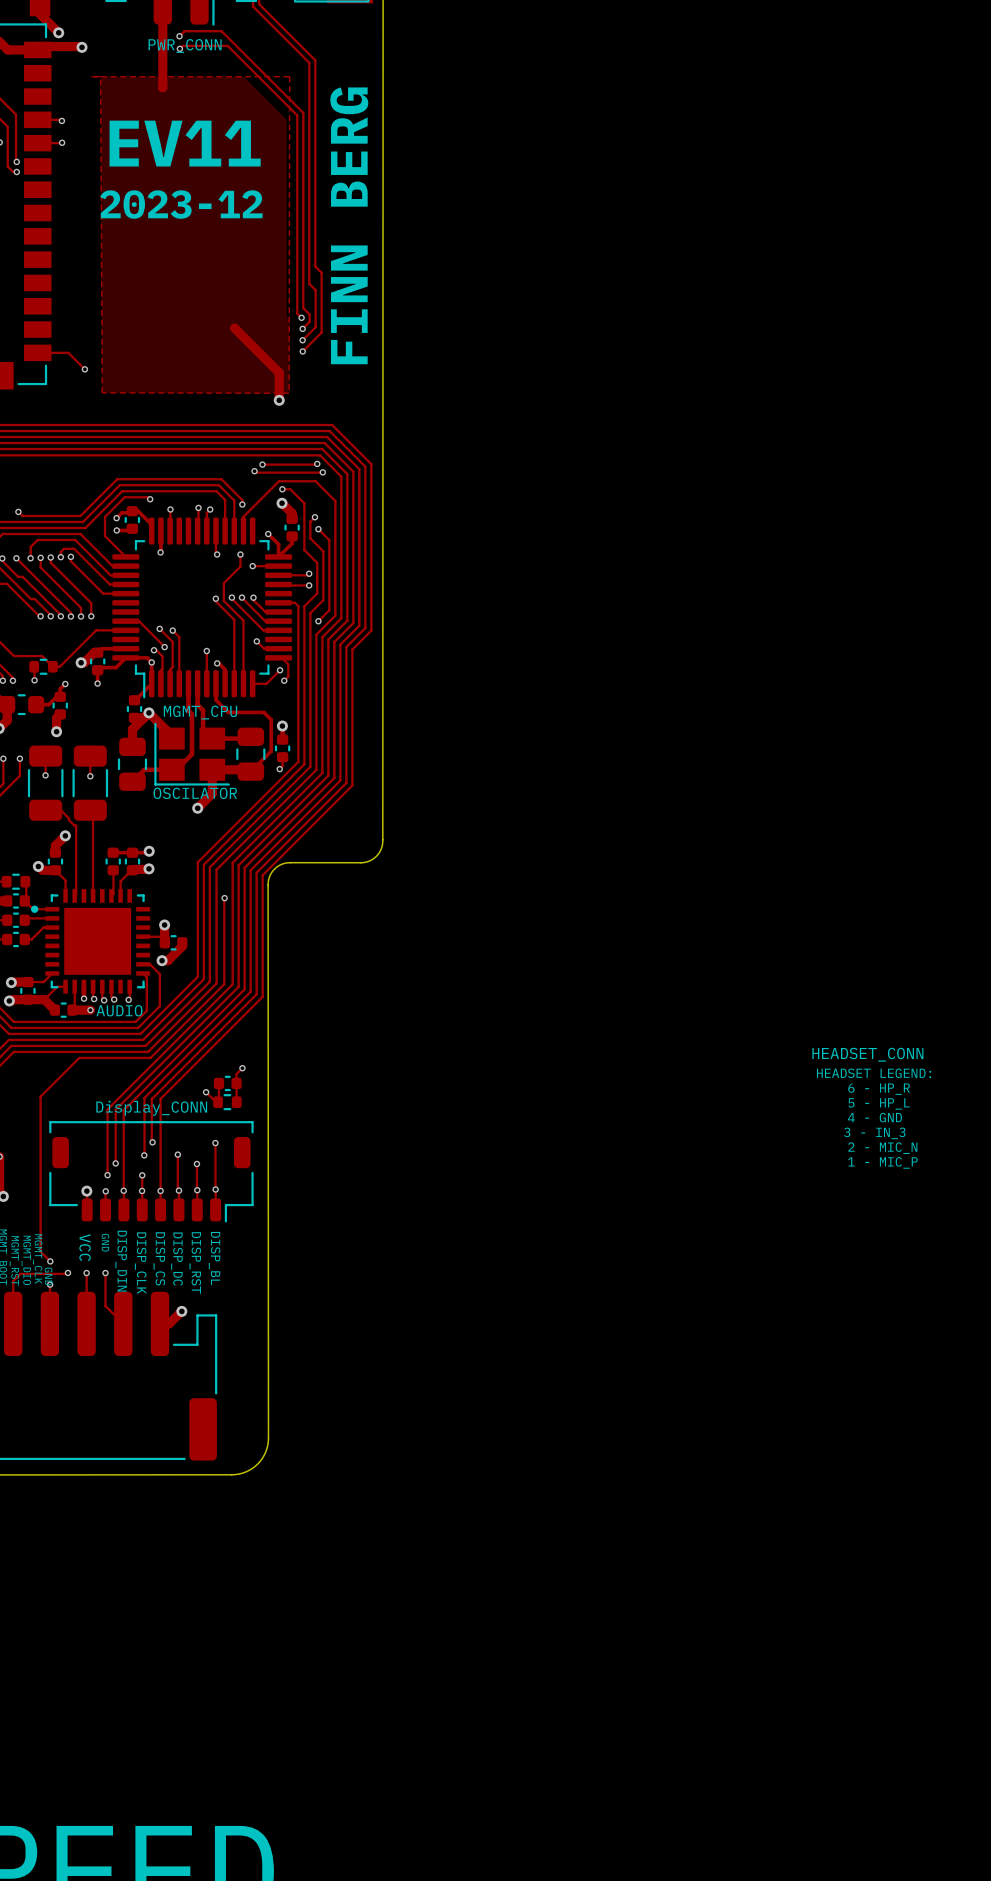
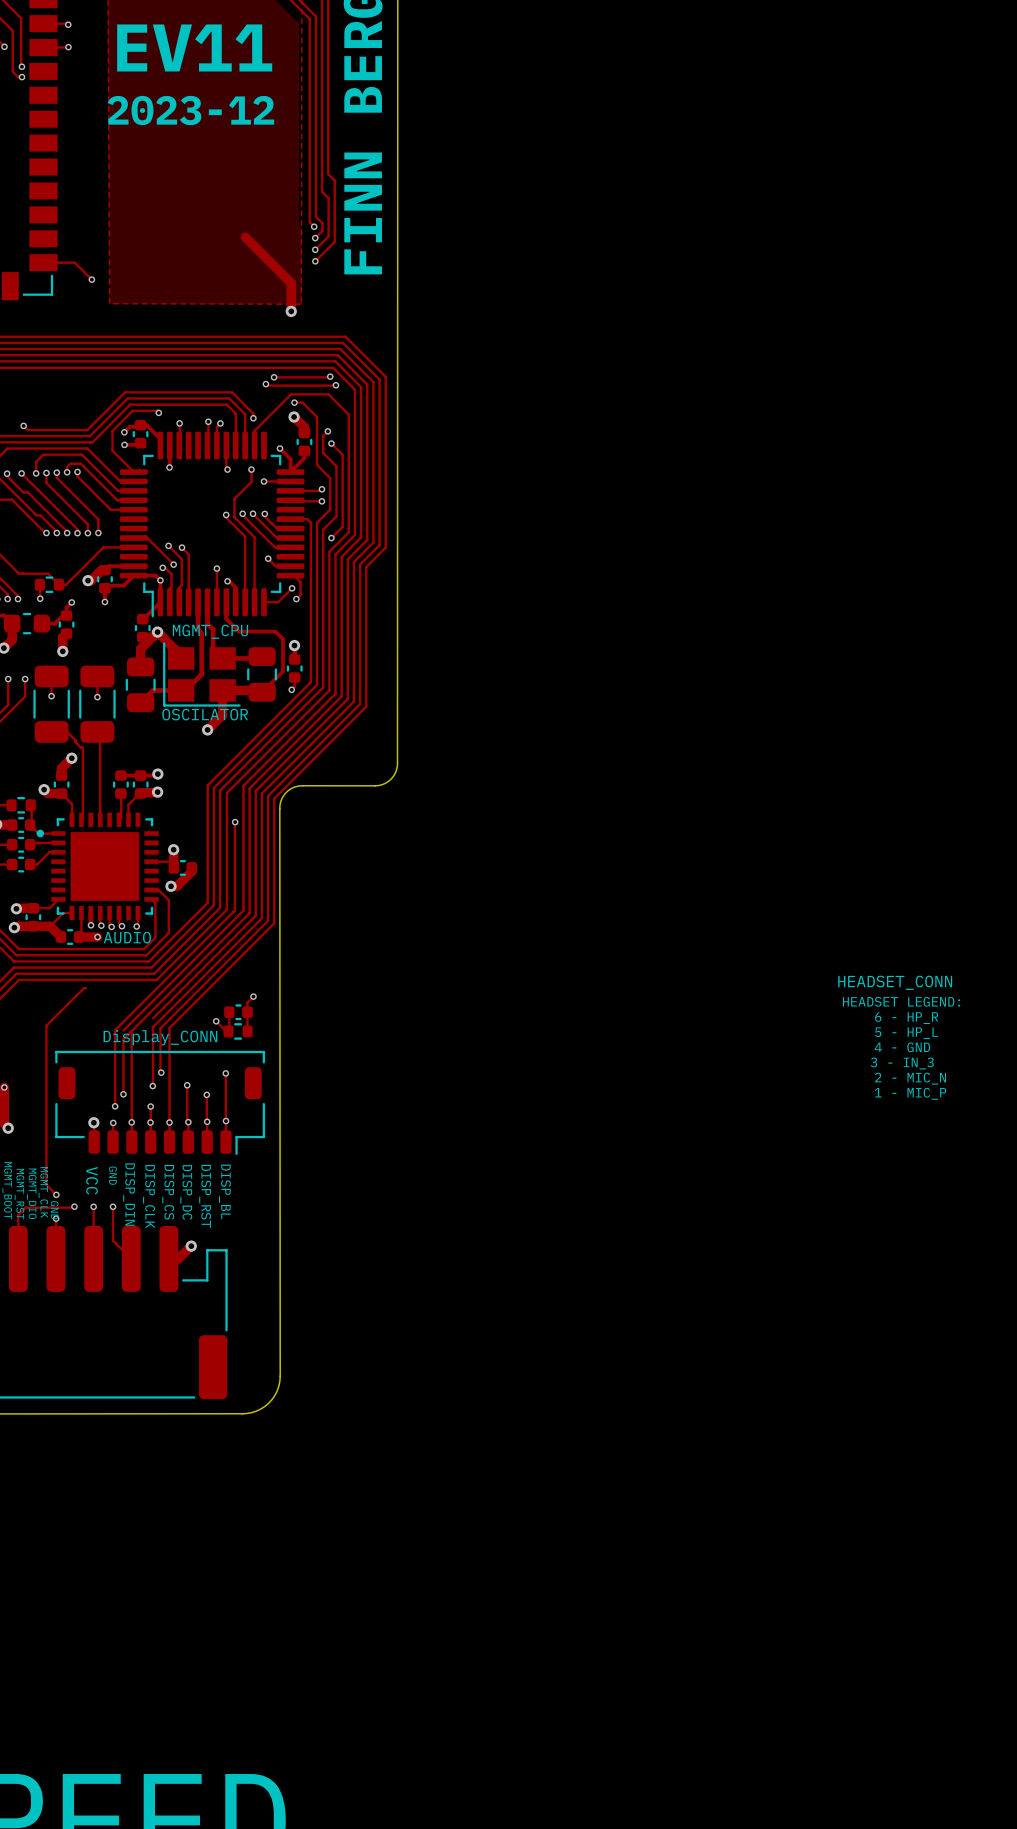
track: (150, 1057) (79, 1057) (77, 1059) -> (86, 988) (84, 988)
track: (144, 1089) (123, 1110) -> (131, 1031) (131, 1039)
track: (115, 1101) (107, 1109) -> (159, 986) (115, 1030) (115, 1038)

